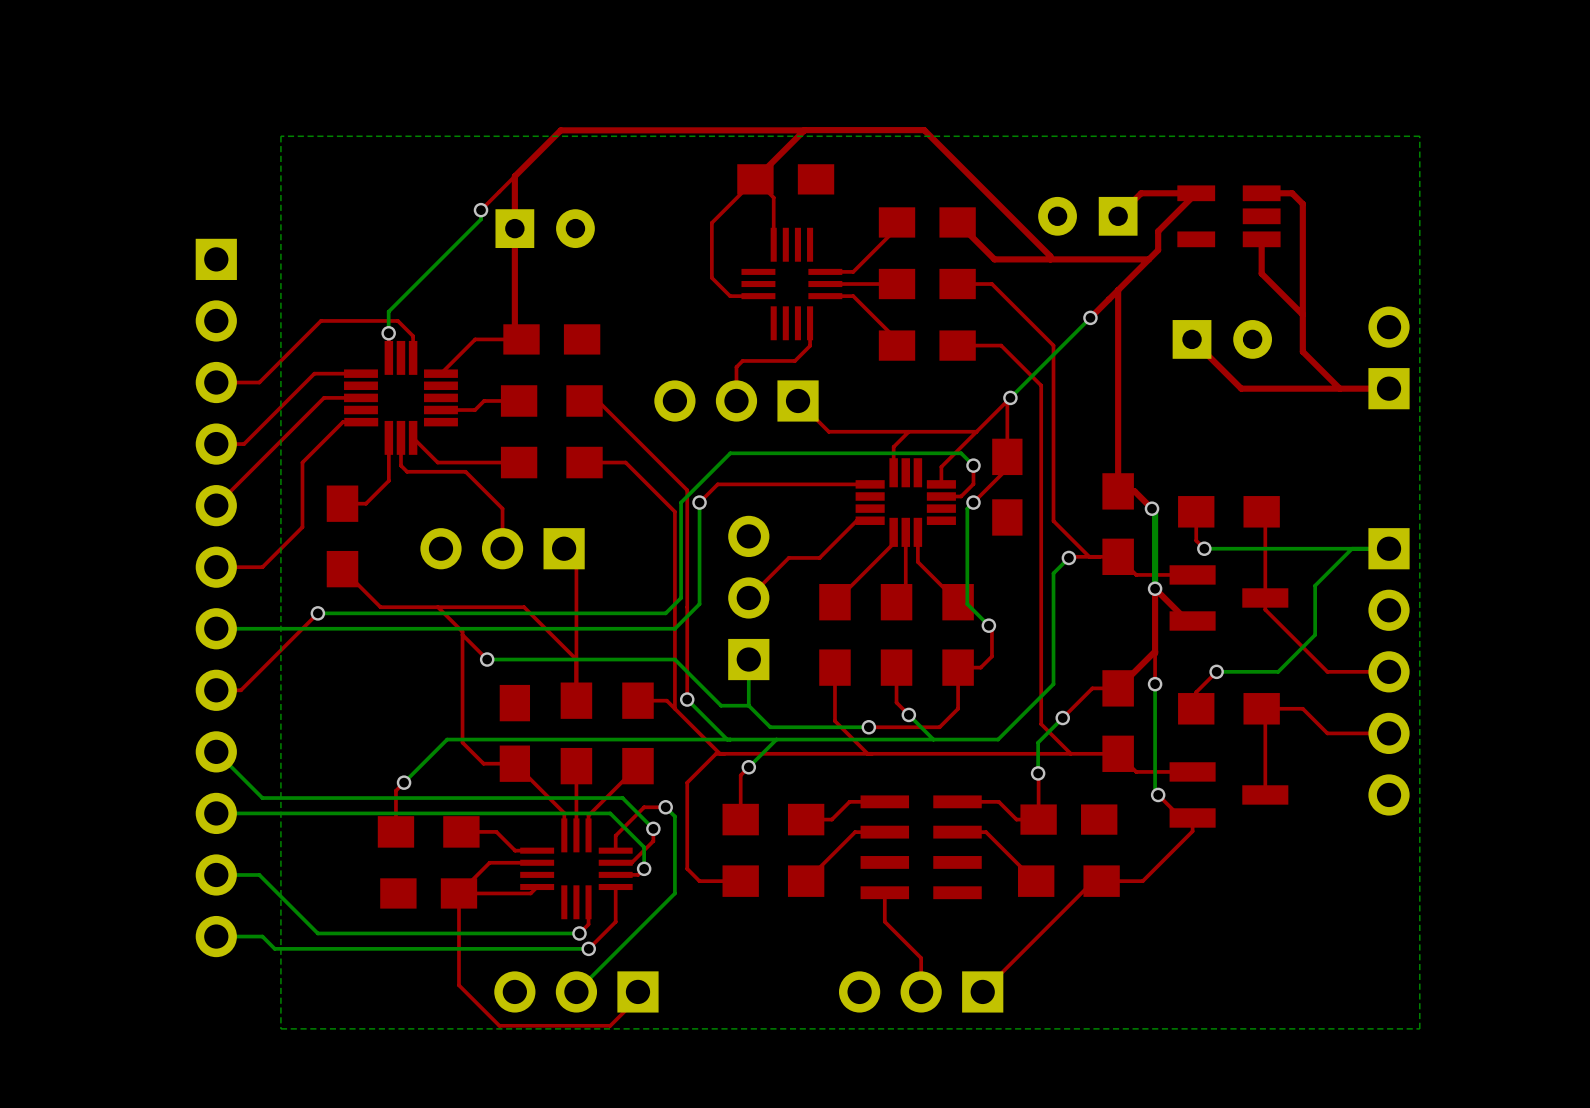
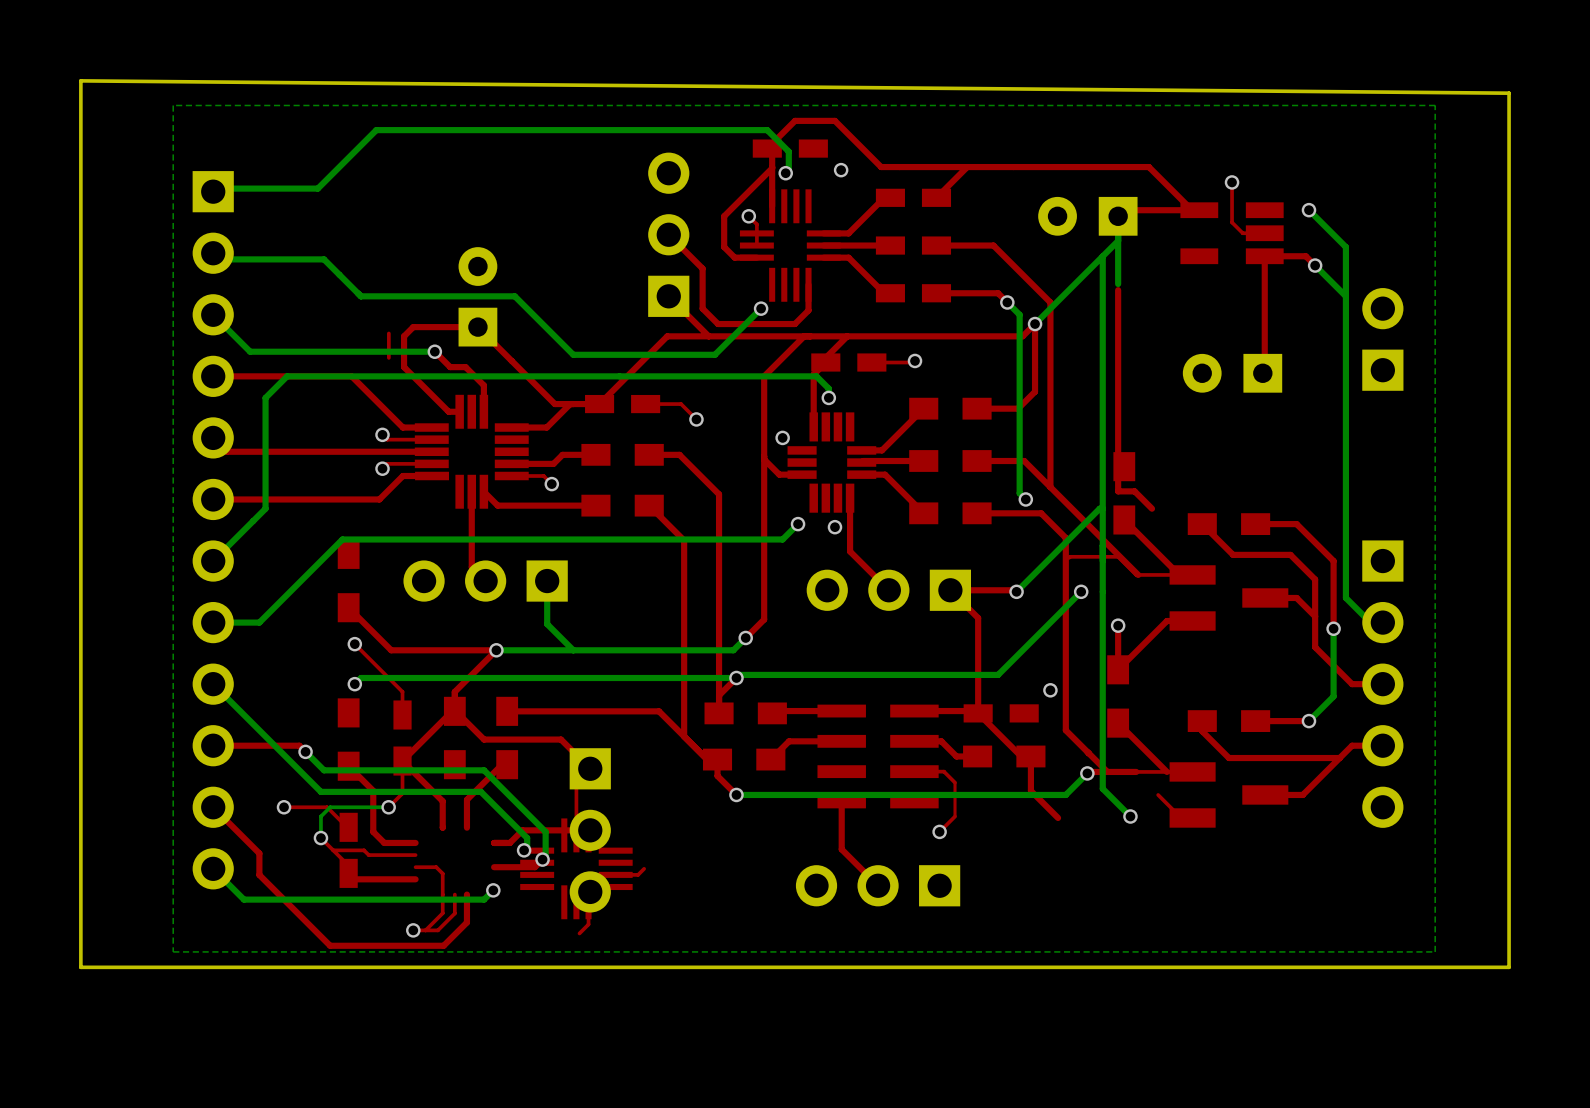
board edge: none -> (80, 80) (80, 967) (1509, 967) (1509, 93) (80, 80)
top track: (804, 130) (560, 130) (514, 176) -> none
bottom zone outline: (1419, 136) (1419, 1028) (280, 1028) (280, 136) (1419, 136) -> (1435, 105) (1435, 951) (173, 951) (173, 105) (1435, 105)
part: none -> (790, 148)
top track: none -> (967, 167) (936, 197)
top track: none -> (772, 168) (724, 216) (724, 247) (734, 257) (756, 257)
via: none -> (841, 170)
bottom track: none -> (785, 173) (788, 170) (788, 151) (767, 130) (376, 130) (317, 188) (216, 188) (213, 191)
via: none -> (785, 173)
top track: (514, 176) (481, 210) -> none
top track: (514, 176) (514, 332) (521, 339) (475, 339) (440, 373) -> none
top track: (755, 179) (773, 197) (773, 244) -> none
top track: (755, 179) (711, 222) (711, 277) (730, 296) (758, 296) -> none
top track: (755, 179) (804, 130) (924, 130) (1050, 256) (1050, 259) -> none
part: (785, 179) -> none
top track: none -> (1232, 182) (1232, 222) (1242, 233) (1264, 233)
via: none -> (1232, 182)
top track: (1261, 193) (1292, 193) (1302, 203) (1302, 351) (1339, 388) -> none
top track: none -> (890, 197) (884, 197) (848, 233) (823, 233)
part: none -> (913, 197)
top track: none -> (772, 206) (772, 153) (767, 148) (795, 120) (834, 120) (881, 167) (1148, 167) (1192, 210)
bottom track: (481, 210) (481, 219) (388, 311) (388, 333) -> none
via: (481, 210) -> none
top track: (1124, 210) (1141, 193) (1196, 193) (1158, 231) (1158, 250) (1090, 317) -> (1124, 210) (1199, 210)
bottom track: none -> (1308, 210) (1345, 247) (1345, 597) (1370, 622) (1382, 622)
via: none -> (1308, 210)
top track: none -> (748, 216) (756, 224) (756, 245)
via: none -> (748, 216)
bottom track: none -> (1118, 216) (1118, 284)
part position: (1228, 216) -> (1232, 233)
top track: (897, 222) (897, 228) (853, 271) (825, 271) -> none
part: (927, 222) -> none
top track: (957, 222) (994, 259) (1148, 259) -> none
part rotation: 0° (545, 228) -> 90° counterclockwise (477, 296)
part position: (545, 228) -> (477, 296)
top track: none -> (668, 234) (702, 268) (702, 308) (718, 324) (794, 324) (808, 310) (808, 284)
part: none -> (668, 234)
top track: (1261, 239) (1261, 273) (1302, 314) -> none
bottom track: none -> (1118, 240) (1035, 324)
top track: none -> (890, 245) (823, 245)
part: none -> (913, 245)
top track: none -> (936, 245) (993, 245) (1050, 302) (1050, 487)
bottom track: none -> (213, 253) (219, 259) (324, 259) (360, 296) (514, 296) (573, 354) (714, 354) (761, 308)
bottom track: none -> (1102, 256) (1102, 788) (1130, 816)
top track: none -> (823, 257) (848, 257) (884, 293) (890, 293)
top track: none -> (1315, 265) (1305, 256) (1264, 256) (1264, 371) (1262, 373)
bottom track: none -> (1315, 265) (1345, 296)
via: none -> (1315, 265)
part footprint: [878, 268, 976, 300] -> [875, 284, 952, 303]
part position: (791, 284) -> (790, 245)
top track: (897, 284) (825, 284) -> none
top track: (957, 284) (991, 284) (1053, 345) (1053, 521) (1089, 556) -> none
top track: none -> (936, 293) (998, 293) (1007, 302)
top track: none -> (668, 296) (708, 336)
top track: (825, 296) (853, 296) (897, 339) (897, 345) -> none
bottom track: none -> (1007, 302) (1019, 314) (1019, 493) (1025, 499)
via: none -> (1007, 302)
via: none -> (761, 308)
bottom track: none -> (213, 314) (250, 351) (434, 351)
bottom track: (1090, 317) (1010, 397) -> none
via: (1090, 317) -> none
top track: (810, 323) (810, 345) (794, 360) (742, 360) (736, 367) (736, 400) -> none
via: none -> (1035, 324)
via position: (388, 333) -> (434, 351)
top track: none -> (804, 336) (764, 376) (764, 619) (745, 637)
top track: none -> (847, 336) (825, 357) (825, 362) (813, 374) (813, 426)
part: (551, 339) -> none
top track: (1192, 339) (1241, 388) (1389, 388) -> none
part rotation: 0° (1222, 339) -> 180° (1232, 373)
part: (927, 345) -> none
top track: (957, 345) (1001, 345) (1041, 385) (1041, 724) (1070, 753) -> none
top track: none -> (434, 351) (450, 367) (465, 367) (483, 385) (483, 411)
top track: (413, 357) (413, 336) (397, 320) (320, 320) (259, 382) (216, 382) -> none
part position: (1389, 357) -> (1382, 339)
top track: none -> (915, 360) (871, 362)
via: none -> (915, 360)
part: none -> (848, 362)
top track: (360, 373) (314, 373) (244, 444) (216, 444) -> none
top track: none -> (213, 376) (351, 376) (402, 427) (431, 427)
top track: (360, 397) (324, 397) (216, 505) -> none
part position: (400, 397) -> (471, 451)
bottom track: none -> (828, 397) (828, 388) (816, 376) (287, 376) (265, 397) (265, 508) (213, 561)
via: none -> (828, 397)
via: (1010, 397) -> none
top track: (519, 400) (484, 400) (475, 410) (440, 410) -> none
part: (551, 400) -> none
top track: (584, 400) (597, 400) (687, 490) (687, 699) -> none
part: (736, 400) -> none
top track: (798, 400) (828, 431) (976, 431) -> none
top track: none -> (570, 404) (546, 427) (511, 427)
part: none -> (622, 404)
top track: none -> (645, 404) (681, 404) (696, 419)
top track: none -> (923, 408) (881, 450) (861, 450)
part: none -> (950, 408)
top track: none -> (977, 408) (1018, 408) (1035, 391) (1035, 324) (1022, 336) (667, 336) (599, 404) (554, 404) (477, 327) (413, 327) (404, 336) (404, 367) (448, 411) (459, 411)
via: none -> (696, 419)
top track: (361, 422) (342, 422) (302, 462) (302, 527) (262, 567) (216, 567) -> none
top track: (908, 431) (893, 446) (893, 472) -> none
top track: none -> (382, 434) (387, 439) (431, 439)
via: none -> (382, 434)
top track: none -> (213, 437) (227, 451) (431, 451)
top track: (388, 437) (388, 480) (365, 503) (342, 503) -> none
top track: (400, 437) (400, 465) (407, 471) (465, 471) (502, 508) (502, 548) -> none
top track: (413, 437) (437, 462) (519, 462) -> none
via: none -> (782, 437)
top track: none -> (595, 454) (562, 454) (553, 463) (511, 463)
part: none -> (622, 454)
top track: none -> (649, 454) (679, 454) (719, 494) (719, 713)
top track: none -> (764, 459) (779, 474) (802, 474)
top track: none -> (923, 461) (863, 461) (861, 462)
part: none -> (950, 461)
top track: none -> (977, 461) (1024, 461) (1138, 574)
part: (551, 462) -> none
top track: (584, 462) (625, 462) (674, 511) (674, 708) -> none
top track: none -> (431, 463) (387, 463) (382, 468)
top track: (973, 465) (973, 484) (961, 496) (941, 496) -> none
bottom track: (973, 465) (961, 453) (730, 453) (681, 502) (681, 597) (665, 613) (317, 613) -> none
via: (973, 465) -> none
via: none -> (382, 468)
top track: none -> (861, 474) (885, 474) (923, 513)
top track: none -> (432, 476) (402, 476) (379, 499) (213, 499)
top track: none -> (511, 476) (543, 476) (551, 484)
via: none -> (551, 484)
top track: (870, 484) (717, 484) (699, 502) -> none
top track: (941, 484) (941, 466) (1010, 397) (1007, 400) (1007, 468) (973, 502) -> none
part: (1007, 487) -> none
top track: none -> (471, 491) (471, 567) (485, 581)
top track: none -> (483, 491) (497, 505) (595, 505)
part: none -> (1124, 493)
part footprint: [1178, 496, 1280, 528] -> [1187, 513, 1271, 536]
top track: none -> (850, 498) (850, 551) (888, 590)
via: none -> (1025, 499)
bottom track: (699, 502) (699, 604) (674, 628) (216, 628) -> none
via: (699, 502) -> none
part rotation: 0° (905, 502) -> 90° clockwise (831, 462)
part position: (905, 502) -> (831, 462)
bottom track: (973, 502) (967, 508) (967, 604) (988, 625) -> none
via: (973, 502) -> none
part: none -> (622, 505)
top track: none -> (649, 505) (684, 540) (684, 736)
bottom track: none -> (1102, 508) (1099, 508) (1016, 591)
bottom track: (1152, 508) (1155, 511) (1155, 588) -> none
via: (1152, 508) -> none
top track: (1196, 511) (1196, 540) (1204, 548) -> none
top track: (1261, 511) (1265, 515) (1265, 609) (1327, 671) (1389, 671) -> none
part: none -> (950, 513)
top track: none -> (977, 513) (1041, 513) (1065, 537) (1065, 730) (1107, 771)
top track: none -> (1124, 519) (1179, 574)
top track: (870, 520) (856, 520) (819, 557) (788, 557) (748, 597) -> none
bottom track: none -> (798, 524) (782, 539) (342, 539) (259, 622) (213, 622)
via: none -> (798, 524)
part: (1118, 524) -> none
top track: none -> (1202, 524) (1233, 554) (1290, 554) (1315, 579) (1315, 647) (1352, 684) (1382, 684)
top track: none -> (1255, 524) (1296, 524) (1333, 561) (1333, 628)
via: none -> (834, 527)
top track: (893, 532) (893, 543) (834, 602) -> none
top track: (905, 532) (905, 592) (896, 602) -> none
top track: (917, 532) (917, 561) (958, 602) -> none
part: (342, 536) -> none
part position: (502, 548) -> (485, 581)
top track: (564, 548) (576, 561) (576, 700) -> none
via: (1204, 548) -> none
bottom track: (1352, 548) (1315, 585) (1315, 634) (1278, 671) (1216, 671) -> none
bottom track: (1389, 548) (1204, 548) -> none
bottom track: (1068, 557) (1053, 573) (1053, 684) (998, 739) (447, 739) (404, 782) -> none
via: (1068, 557) -> none
top track: (342, 569) (380, 607) (524, 607) (576, 659) -> none
part: none -> (348, 581)
bottom track: none -> (547, 581) (547, 624) (573, 650)
via: (1155, 588) -> none
part: none -> (888, 590)
top track: none -> (1016, 591) (1015, 590) (950, 590) (978, 618) (978, 713)
via: none -> (1016, 591)
bottom track: none -> (1081, 591) (998, 674) (739, 674) (736, 678) (360, 678) (354, 684)
via: none -> (1081, 591)
part position: (216, 597) -> (213, 530)
part: (748, 597) -> none
top track: none -> (1265, 597) (1296, 597) (1315, 616)
top track: none -> (348, 607) (391, 650) (496, 650) (454, 691) (454, 711)
top track: (437, 607) (462, 631) (462, 742) (483, 763) (514, 763) (564, 813) (564, 835) -> none
top track: (317, 613) (240, 690) (216, 690) -> none
via: (317, 613) -> none
top track: (1187, 620) (1155, 588) (1155, 653) -> (1187, 620) (1166, 620) (1118, 669) (1118, 625)
top track: (988, 625) (991, 628) (991, 656) (980, 667) (958, 667) (958, 708) (939, 727) (868, 727) -> none
via: (988, 625) -> none
via: none -> (1118, 625)
bottom track: none -> (1333, 628) (1333, 696) (1308, 721)
via: none -> (1333, 628)
top track: (462, 634) (487, 659) -> none
part: (834, 634) -> none
part: (896, 634) -> none
part: (958, 634) -> none
bottom track: none -> (745, 637) (733, 650) (496, 650)
via: none -> (745, 637)
top track: none -> (354, 644) (402, 691) (402, 714)
via: none -> (354, 644)
bottom track: (487, 659) (674, 659) (721, 705) (748, 705) -> none
via position: (487, 659) -> (496, 650)
bottom track: (748, 659) (748, 705) -> none
top track: (834, 667) (834, 721) (867, 753) -> none
top track: (896, 667) (896, 702) (908, 714) -> none
top track: (1216, 671) (1196, 692) (1196, 708) -> none
via: (1216, 671) -> none
part position: (1389, 671) -> (1382, 684)
top track: none -> (736, 678) (719, 695)
via: none -> (736, 678)
bottom track: none -> (213, 684) (320, 791) (481, 791) (527, 838) (527, 847) (524, 850)
via: none -> (354, 684)
part footprint: [499, 684, 531, 782] -> [496, 696, 519, 780]
top track: (1155, 684) (1155, 651) (1118, 688) (1092, 688) (1062, 718) -> none
bottom track: (1155, 684) (1155, 791) (1158, 794) -> none
via: (1155, 684) -> none
via: none -> (1050, 690)
part footprint: [1178, 693, 1280, 725] -> [1187, 710, 1271, 732]
part: none -> (1118, 696)
bottom track: (687, 699) (727, 739) -> none
via: (687, 699) -> none
top track: (637, 700) (666, 700) (719, 753) -> none
bottom track: (748, 705) (770, 727) (868, 727) -> none
top track: none -> (507, 711) (659, 711) (707, 759) (717, 759) (717, 775) (736, 794)
top track: none -> (841, 711) (774, 711) (772, 713)
top track: none -> (914, 711) (975, 711) (1021, 756) (1030, 756) (1030, 790) (1058, 817)
part: none -> (745, 713)
part: none -> (1001, 713)
bottom track: (908, 714) (933, 739) -> none
via: (908, 714) -> none
bottom track: (1062, 718) (1038, 742) (1038, 773) -> none
via: (1062, 718) -> none
part: (1118, 721) -> none
top track: none -> (1202, 721) (1202, 731) (1228, 758) (1339, 758)
top track: none -> (1308, 721) (1255, 721)
via: none -> (1308, 721)
top track: none -> (1118, 723) (1166, 771)
via: (868, 727) -> none
part: (576, 733) -> none
part: (637, 733) -> none
top track: (1389, 733) (1327, 733) (1302, 708) (1261, 708) (1265, 712) (1265, 794) -> (1382, 745) (1352, 745) (1302, 794) (1265, 794)
part: none -> (402, 738)
part: none -> (454, 738)
part: none -> (348, 739)
bottom track: (776, 739) (748, 767) -> none
top track: none -> (841, 741) (789, 741) (770, 759)
top track: none -> (914, 741) (941, 741) (956, 756) (977, 756)
top track: none -> (213, 745) (299, 745) (305, 751)
bottom track: (216, 751) (262, 798) (622, 798) (653, 828) -> none
bottom track: none -> (305, 751) (324, 770) (484, 770) (545, 831) (545, 856) (542, 859)
via: none -> (305, 751)
part: none -> (1004, 756)
part: none -> (744, 759)
top track: none -> (402, 761) (402, 793) (388, 807)
top track: none -> (402, 761) (442, 801) (442, 827)
top track: none -> (402, 761) (452, 711) (455, 711) (484, 739) (561, 739) (590, 768)
top track: none -> (507, 764) (502, 764) (466, 799) (466, 827)
top track: none -> (348, 766) (373, 790) (373, 831) (384, 842) (415, 842)
top track: (637, 766) (588, 815) (588, 835) -> none
top track: (748, 767) (740, 775) (740, 819) -> none
via position: (748, 767) -> (736, 794)
top track: none -> (914, 771) (944, 771) (955, 782) (955, 816) (939, 831)
top track: (1136, 771) (1118, 753) (716, 753) (687, 782) (687, 868) (699, 881) (740, 881) -> (1136, 771) (1087, 773)
top track: (1038, 773) (1038, 819) (1016, 819) (998, 801) (957, 801) -> none
via: (1038, 773) -> none
bottom track: none -> (1087, 773) (1065, 794) (736, 794)
via: none -> (1087, 773)
top track: (404, 782) (395, 790) (395, 831) -> none
via position: (404, 782) -> (388, 807)
via position: (1158, 794) -> (1130, 816)
top track: none -> (841, 801) (841, 849) (878, 885)
top track: (884, 801) (849, 801) (831, 819) (806, 819) -> none
top track: none -> (213, 807) (259, 853) (259, 874) (330, 945) (443, 945) (466, 922) (466, 894)
top track: none -> (284, 807) (327, 807) (348, 827)
via: none -> (284, 807)
bottom track: none -> (388, 807) (330, 807) (320, 816) (320, 838)
top track: (665, 807) (644, 807) (615, 835) (615, 850) -> none
bottom track: (665, 807) (674, 816) (674, 893) (576, 991) -> none
via: (665, 807) -> none
bottom track: (216, 813) (610, 813) (644, 847) (644, 868) -> none
top track: (1192, 817) (1192, 831) (1142, 881) (1093, 881) (982, 991) -> none
part: (773, 819) -> none
part: (1068, 819) -> none
top track: (653, 828) (653, 841) (631, 862) (615, 862) -> none
via: (653, 828) -> none
top track: none -> (590, 830) (522, 830) (509, 842) (494, 842)
part: none -> (590, 830)
part: (428, 831) -> none
top track: (461, 831) (496, 831) (515, 850) (537, 850) -> none
via: none -> (939, 831)
top track: (884, 832) (855, 832) (806, 881) -> none
top track: (957, 832) (986, 832) (1036, 881) -> none
top track: none -> (320, 838) (348, 865) (348, 873) (354, 879) (415, 879)
via: none -> (320, 838)
part position: (921, 847) -> (878, 756)
top track: none -> (333, 850) (364, 850) (368, 855) (415, 855)
part: none -> (348, 850)
via: none -> (524, 850)
top track: none -> (542, 859) (534, 867) (494, 867)
via: none -> (542, 859)
top track: (537, 862) (489, 862) (458, 893) -> none
top track: none -> (415, 867) (436, 867) (442, 873) (442, 913) (425, 930)
bottom track: none -> (213, 868) (244, 899) (484, 899) (493, 890)
via: (644, 868) -> none
bottom track: (216, 874) (259, 874) (317, 933) (579, 933) -> none
part: (773, 881) -> none
part: (1068, 881) -> none
top track: (537, 887) (530, 893) (458, 893) -> none
top track: (615, 887) (615, 921) (588, 948) -> none
via: none -> (493, 890)
top track: (884, 892) (884, 921) (921, 958) (921, 991) -> none
part: (428, 893) -> none
top track: (458, 893) (458, 985) (499, 1025) (610, 1025) (637, 998) (637, 991) -> none
top track: none -> (454, 894) (454, 913) (437, 930) (413, 930)
via: none -> (413, 930)
via: (579, 933) -> none
bottom track: (216, 936) (262, 936) (274, 948) (588, 948) -> none
via: (588, 948) -> none
part: (576, 991) -> none
part position: (921, 991) -> (878, 885)

